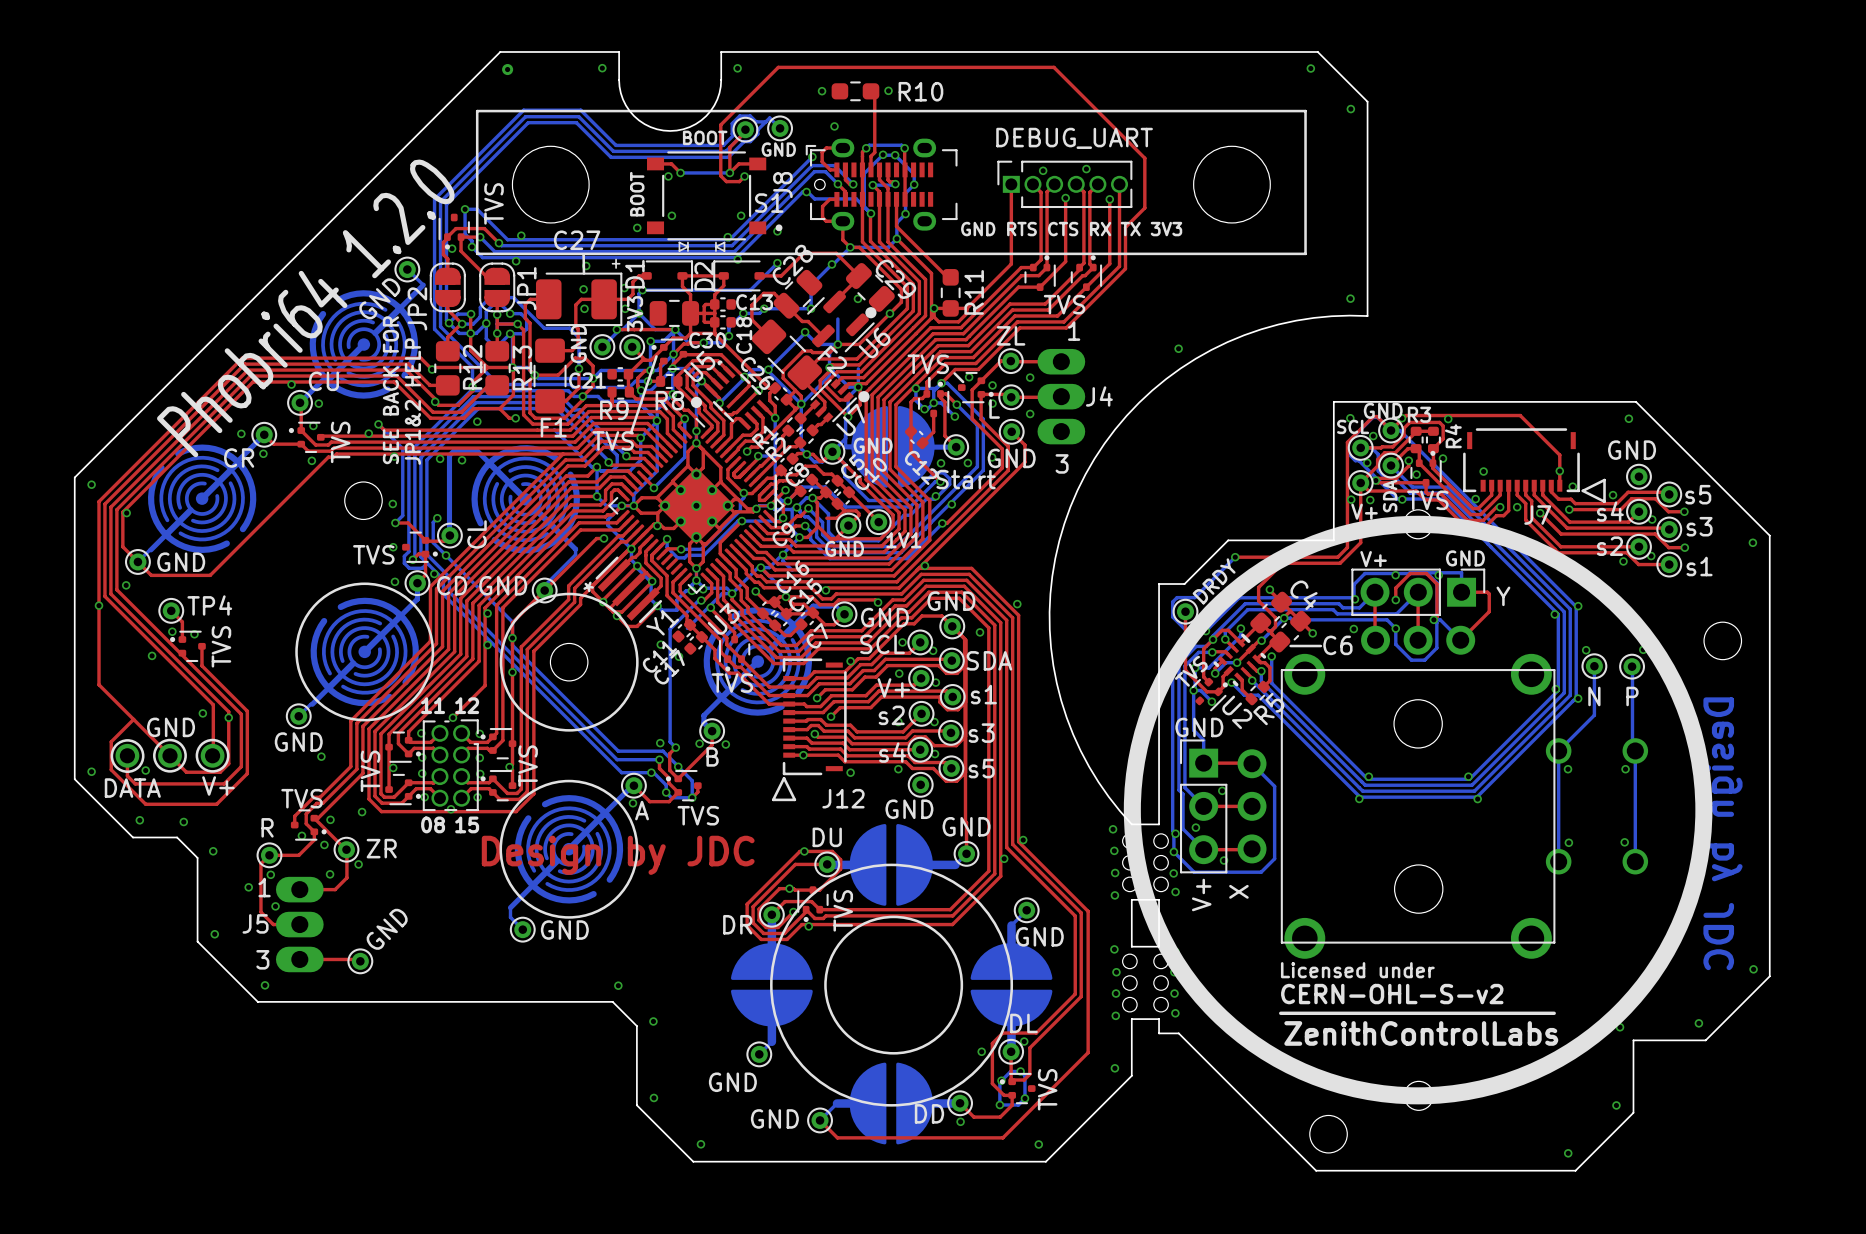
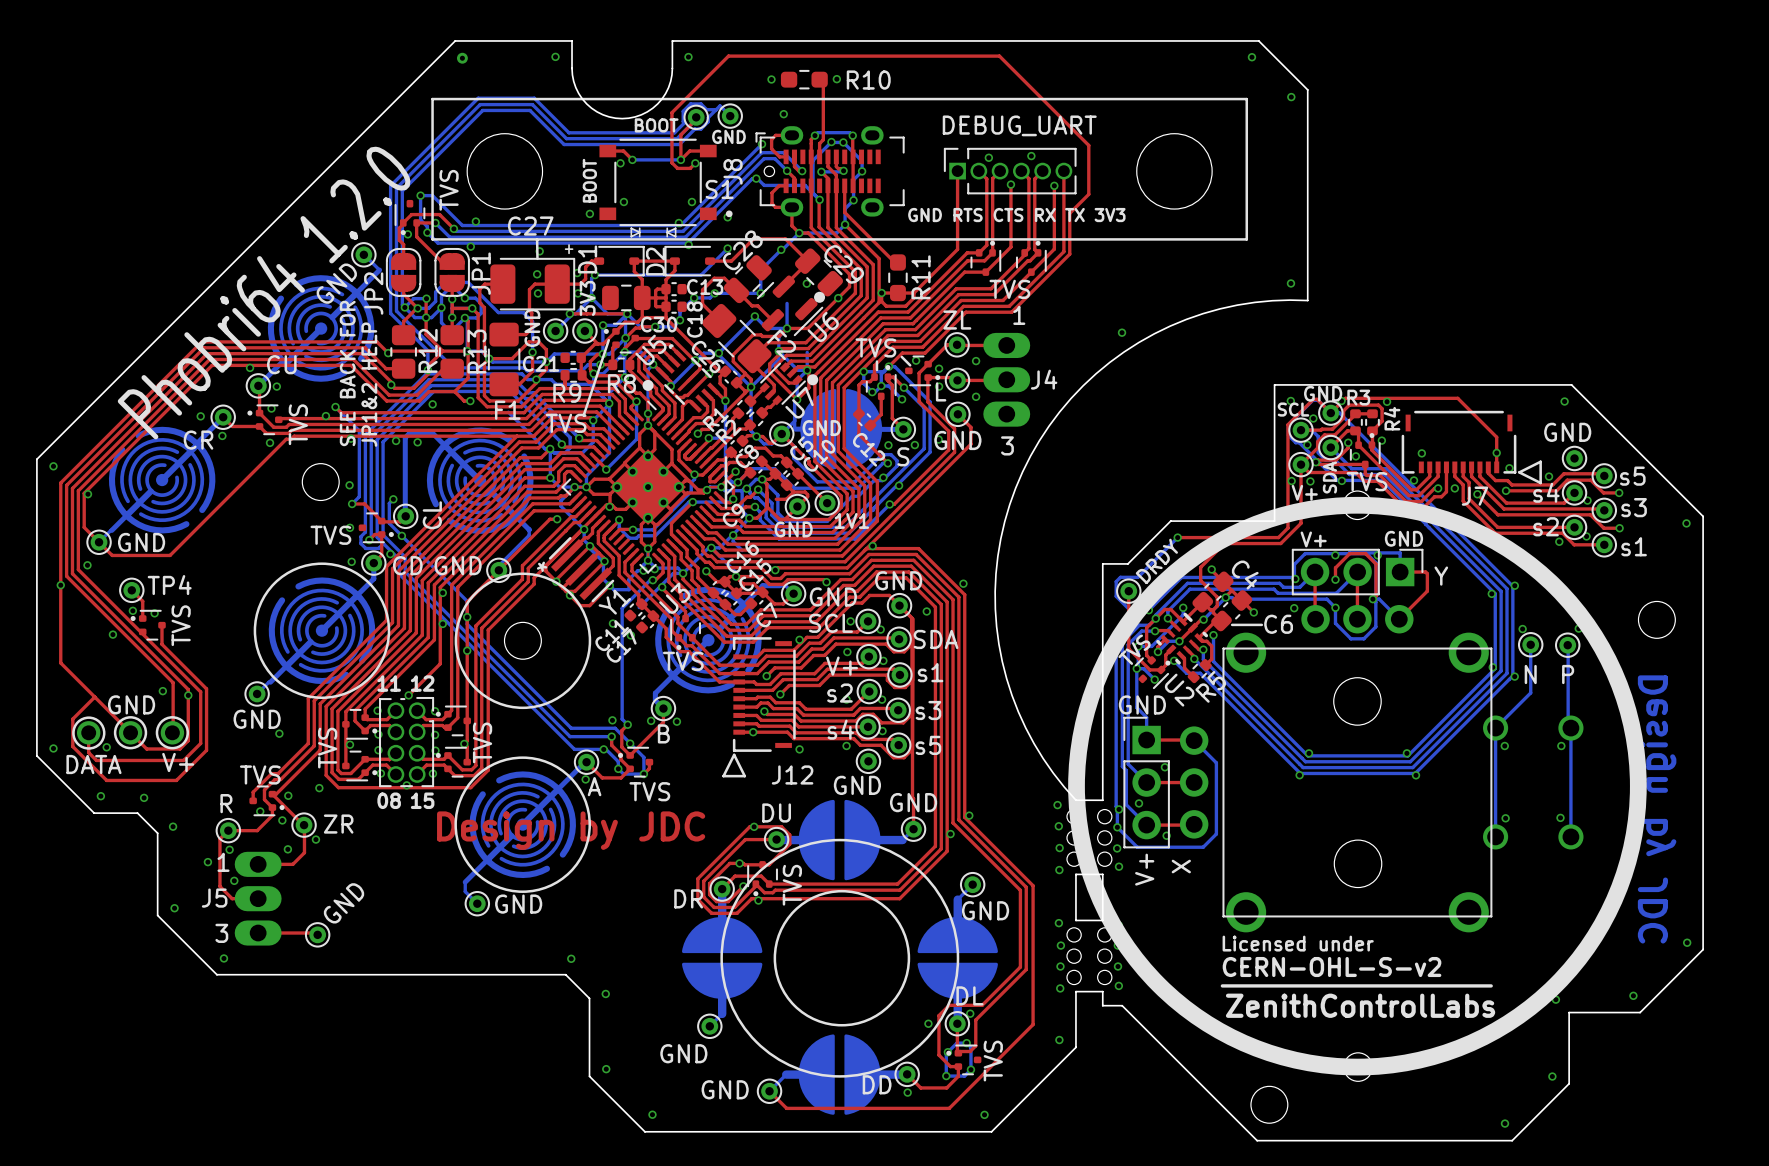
part value: Start (966, 479) -> S (903, 456)

